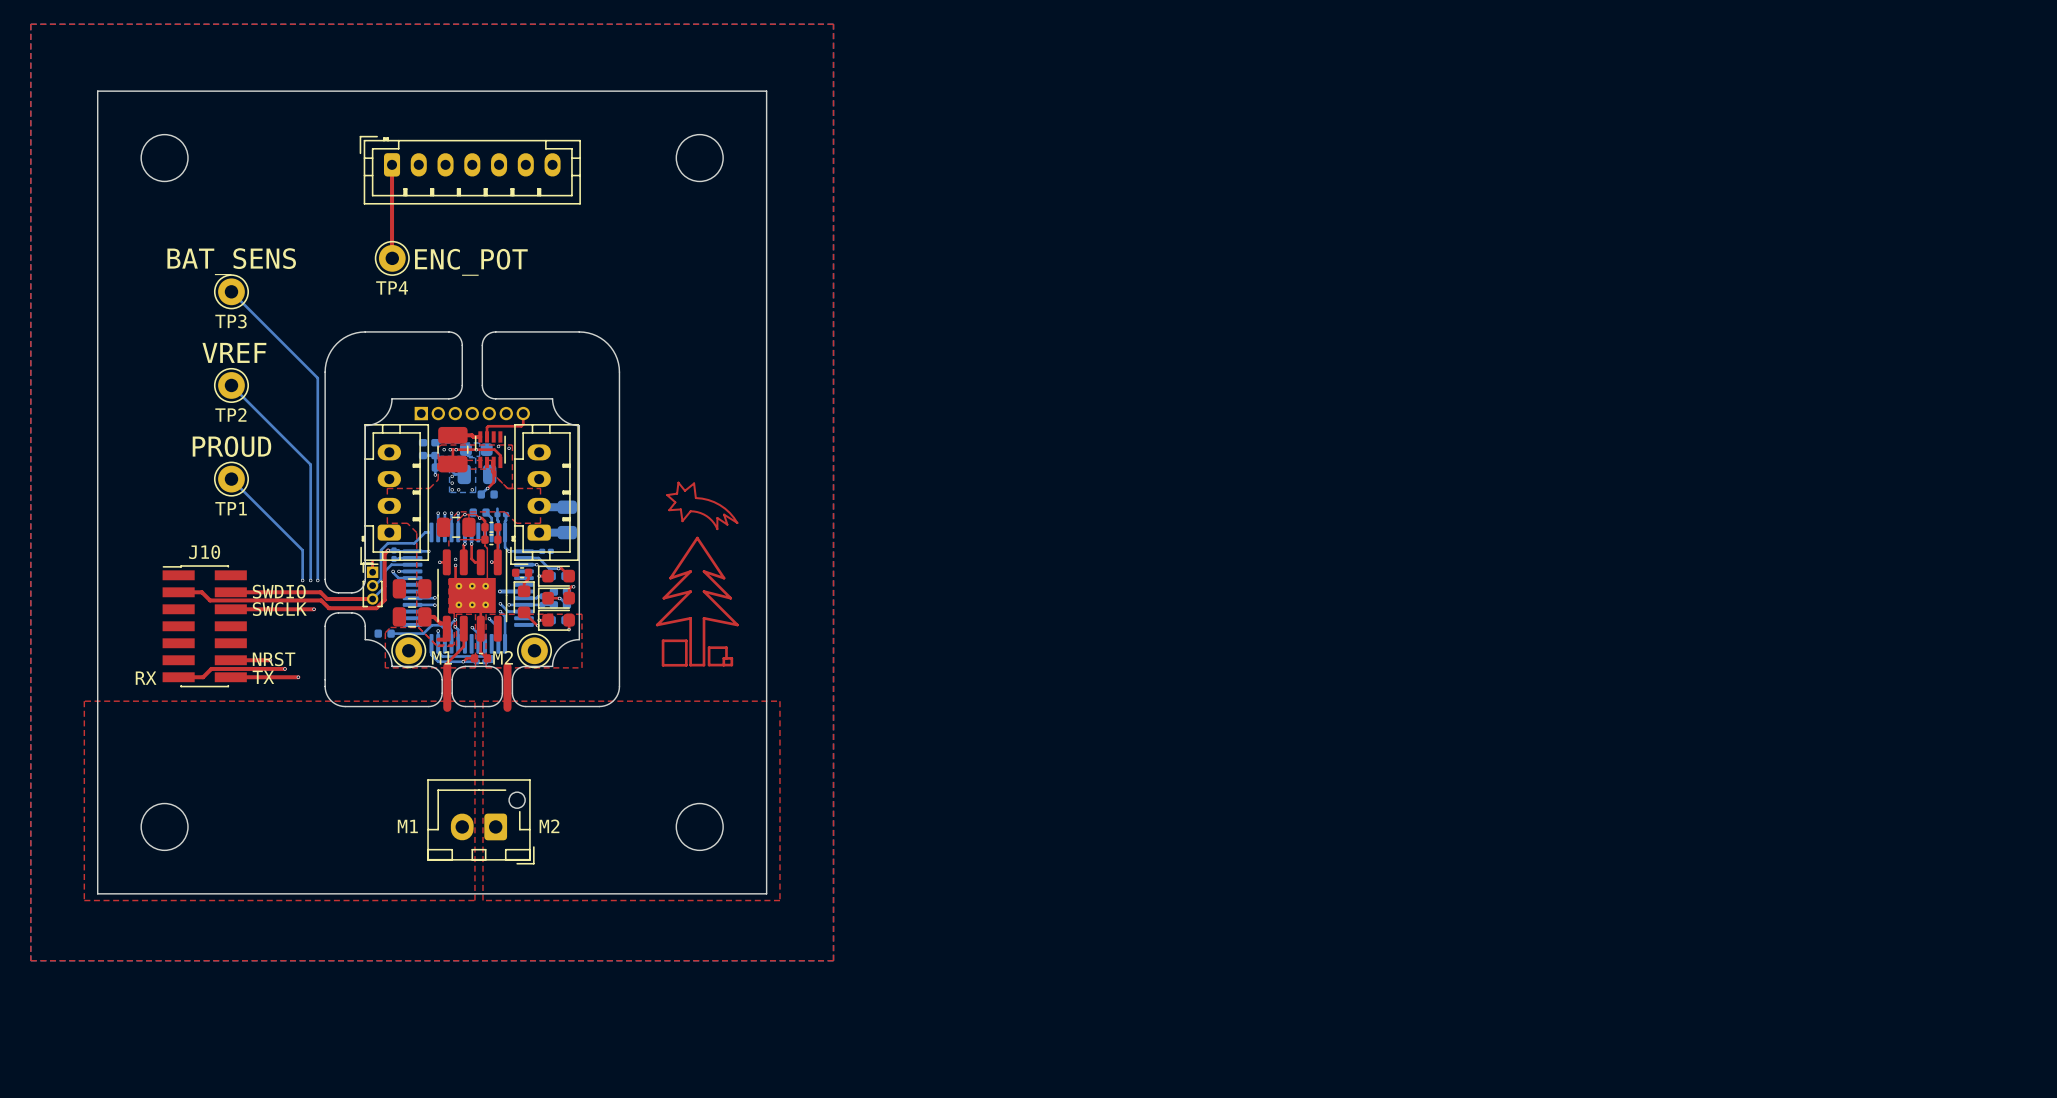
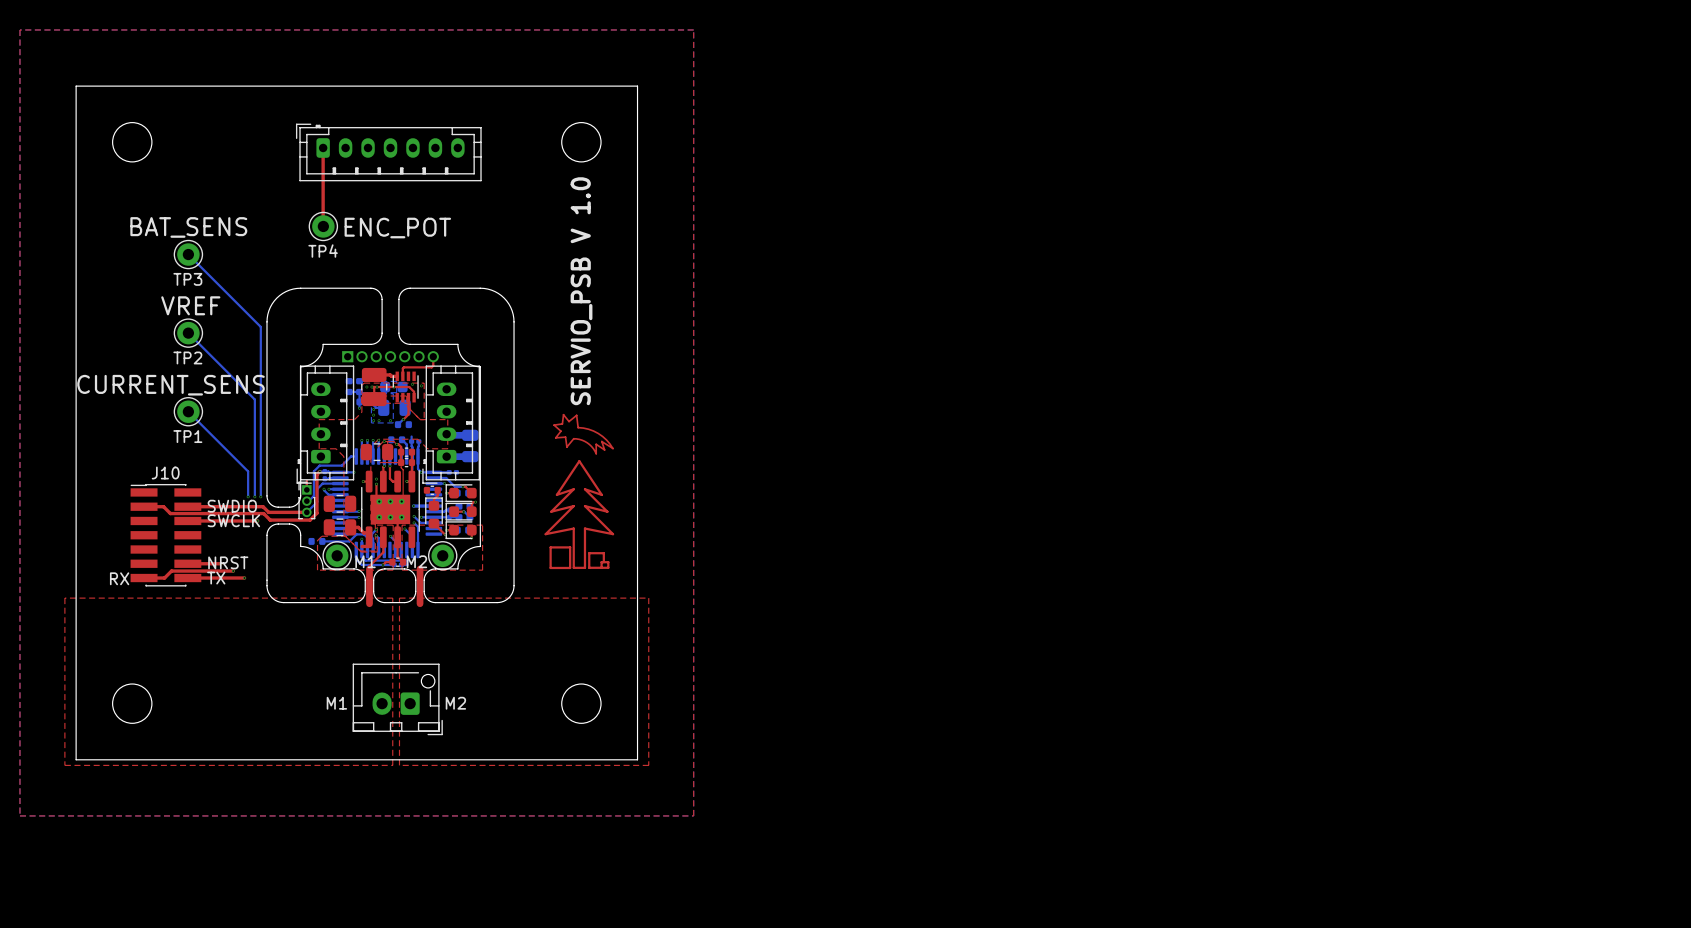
text: none -> SERVIO_PSB V 1.0 (581, 291)
text: PROUD (231, 446) -> none
text: none -> CURRENT_SENS (170, 385)

